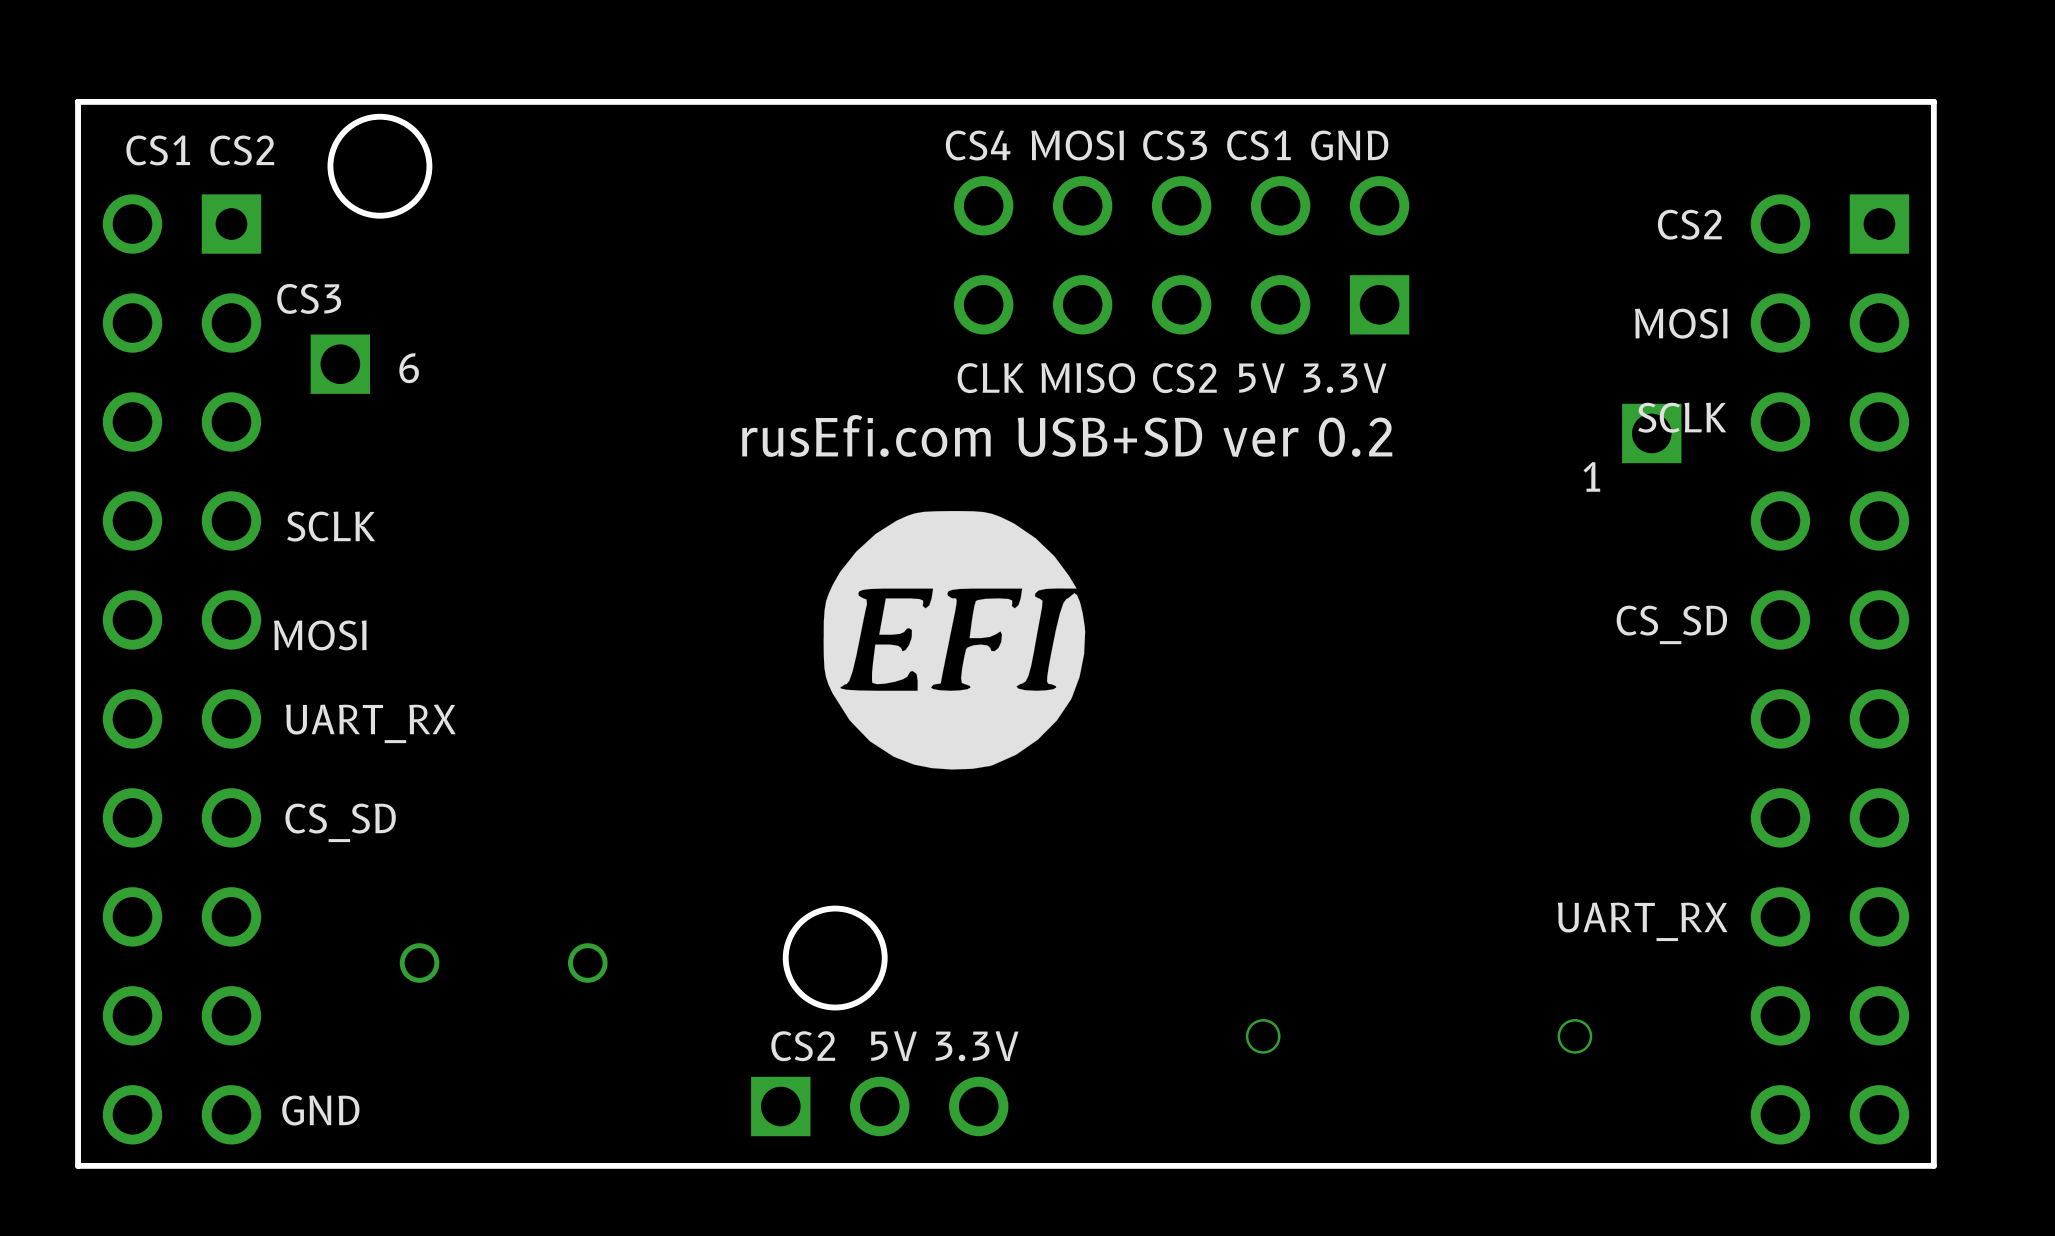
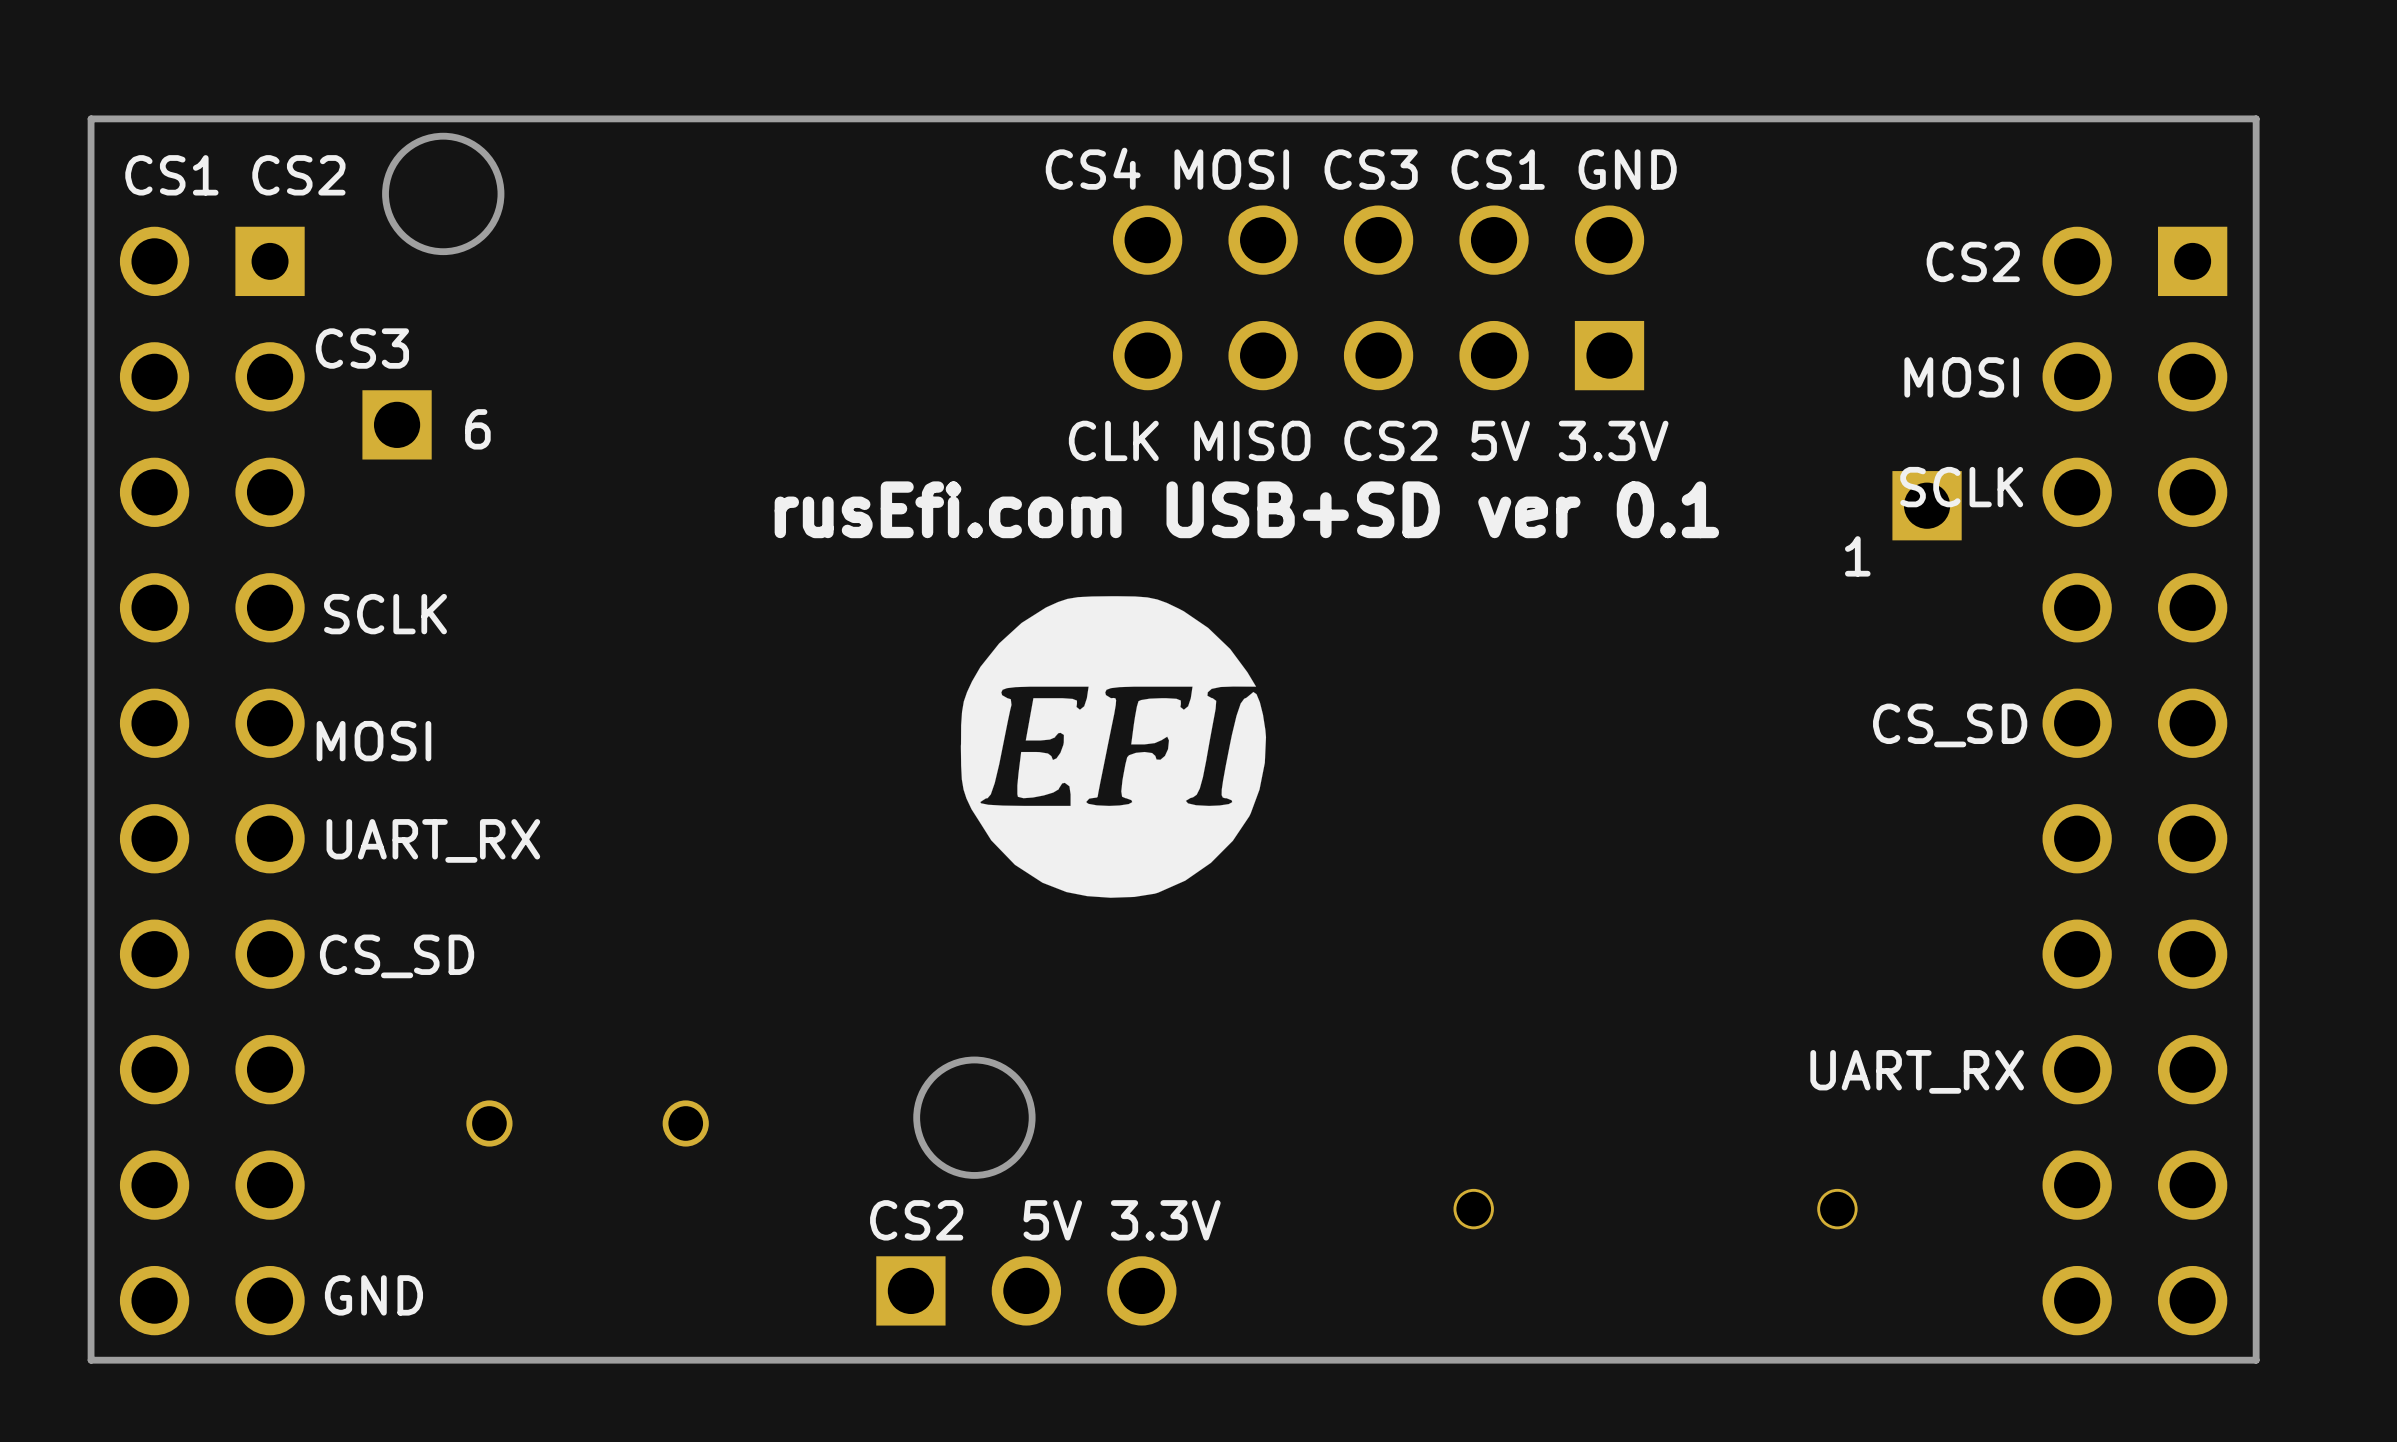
text: rusEfi.com USB+SD ver 0.2 (1067, 435) -> rusEfi.com USB+SD ver 0.1 (1246, 509)

